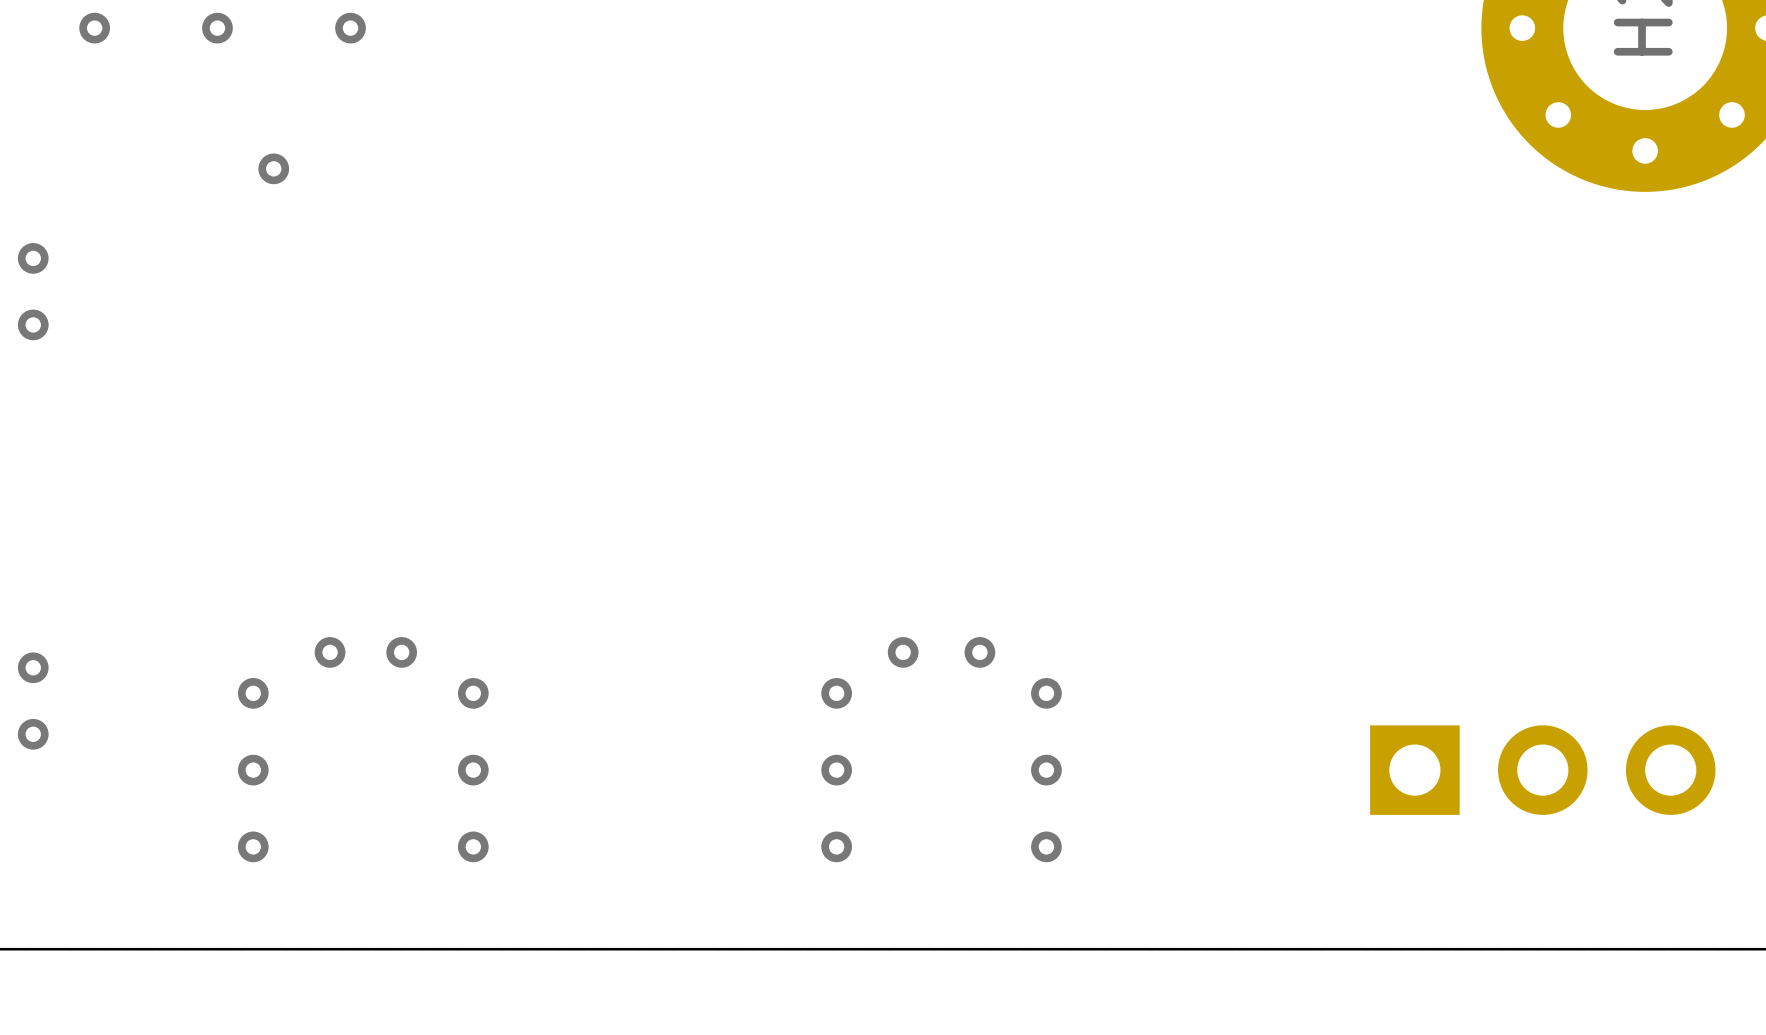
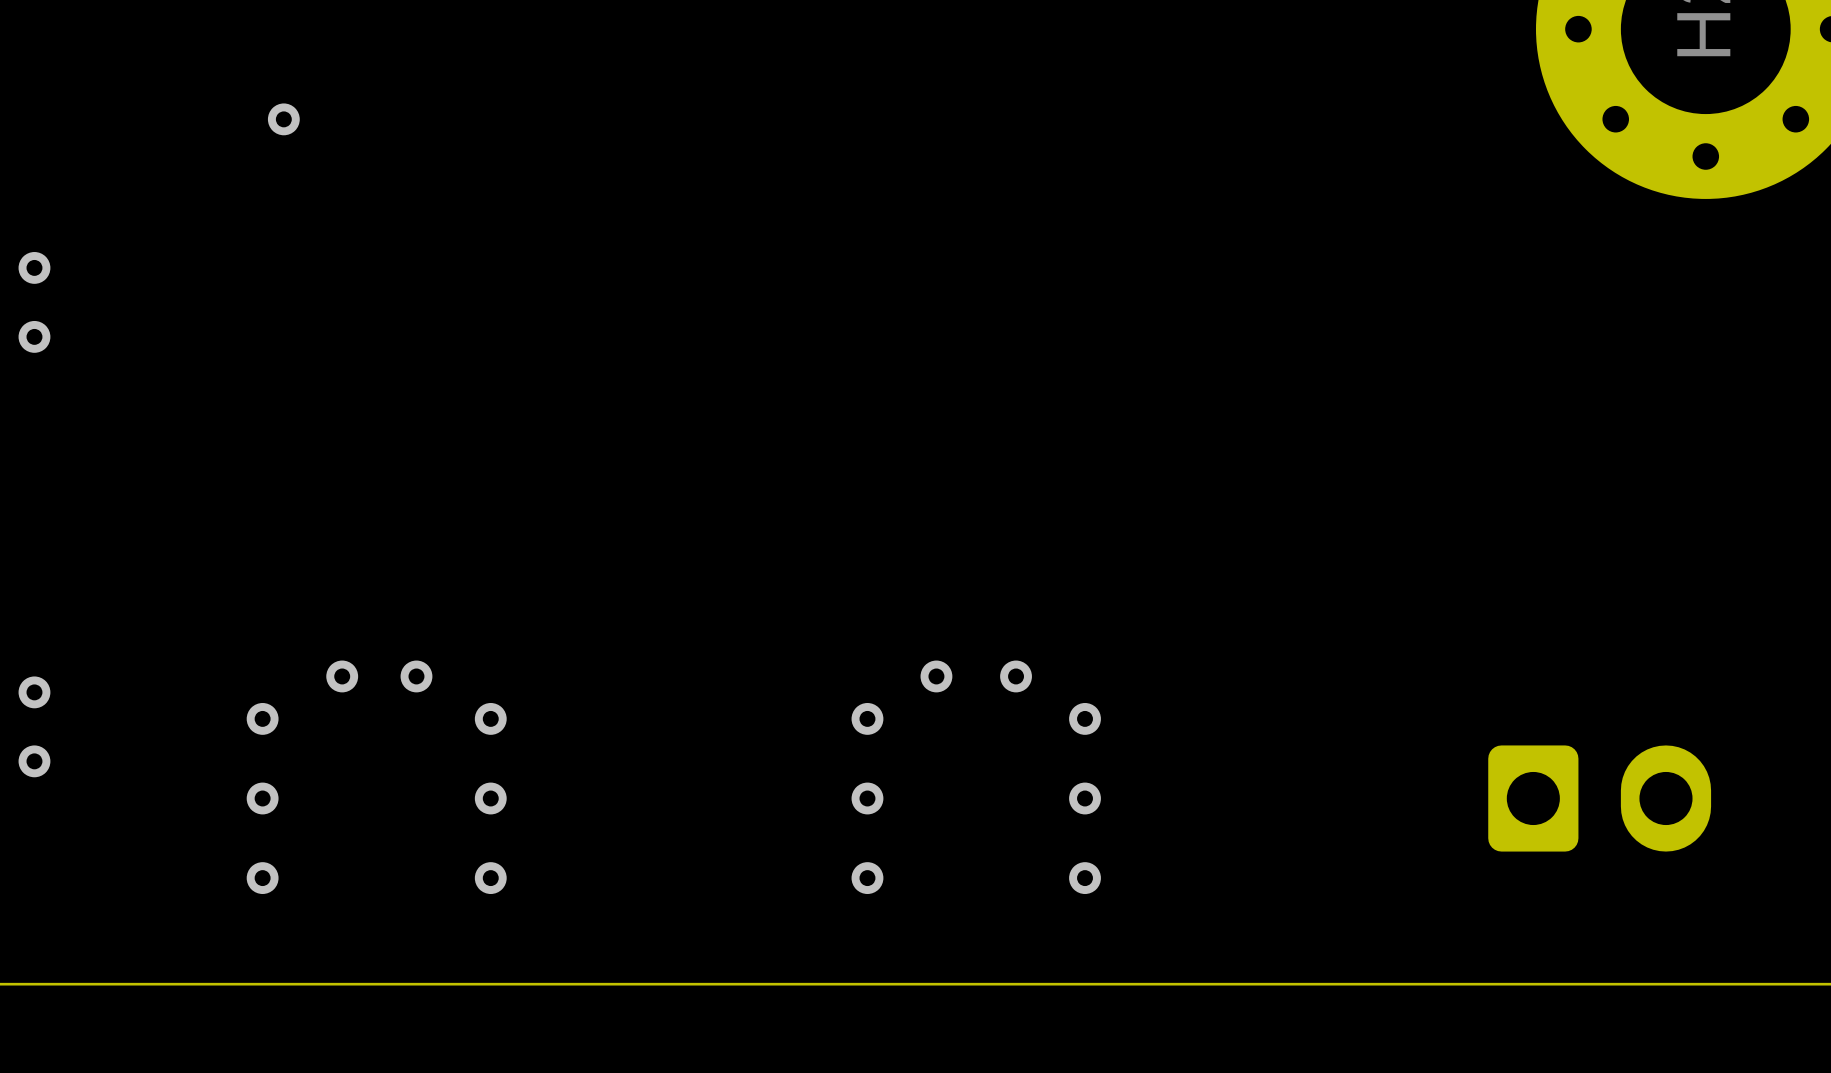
via: (94, 28) -> none
via: (217, 28) -> none
via: (350, 28) -> none
via: none -> (283, 119)
via: (273, 168) -> none
part footprint: [1370, 725, 1716, 815] -> [1488, 745, 1712, 852]

